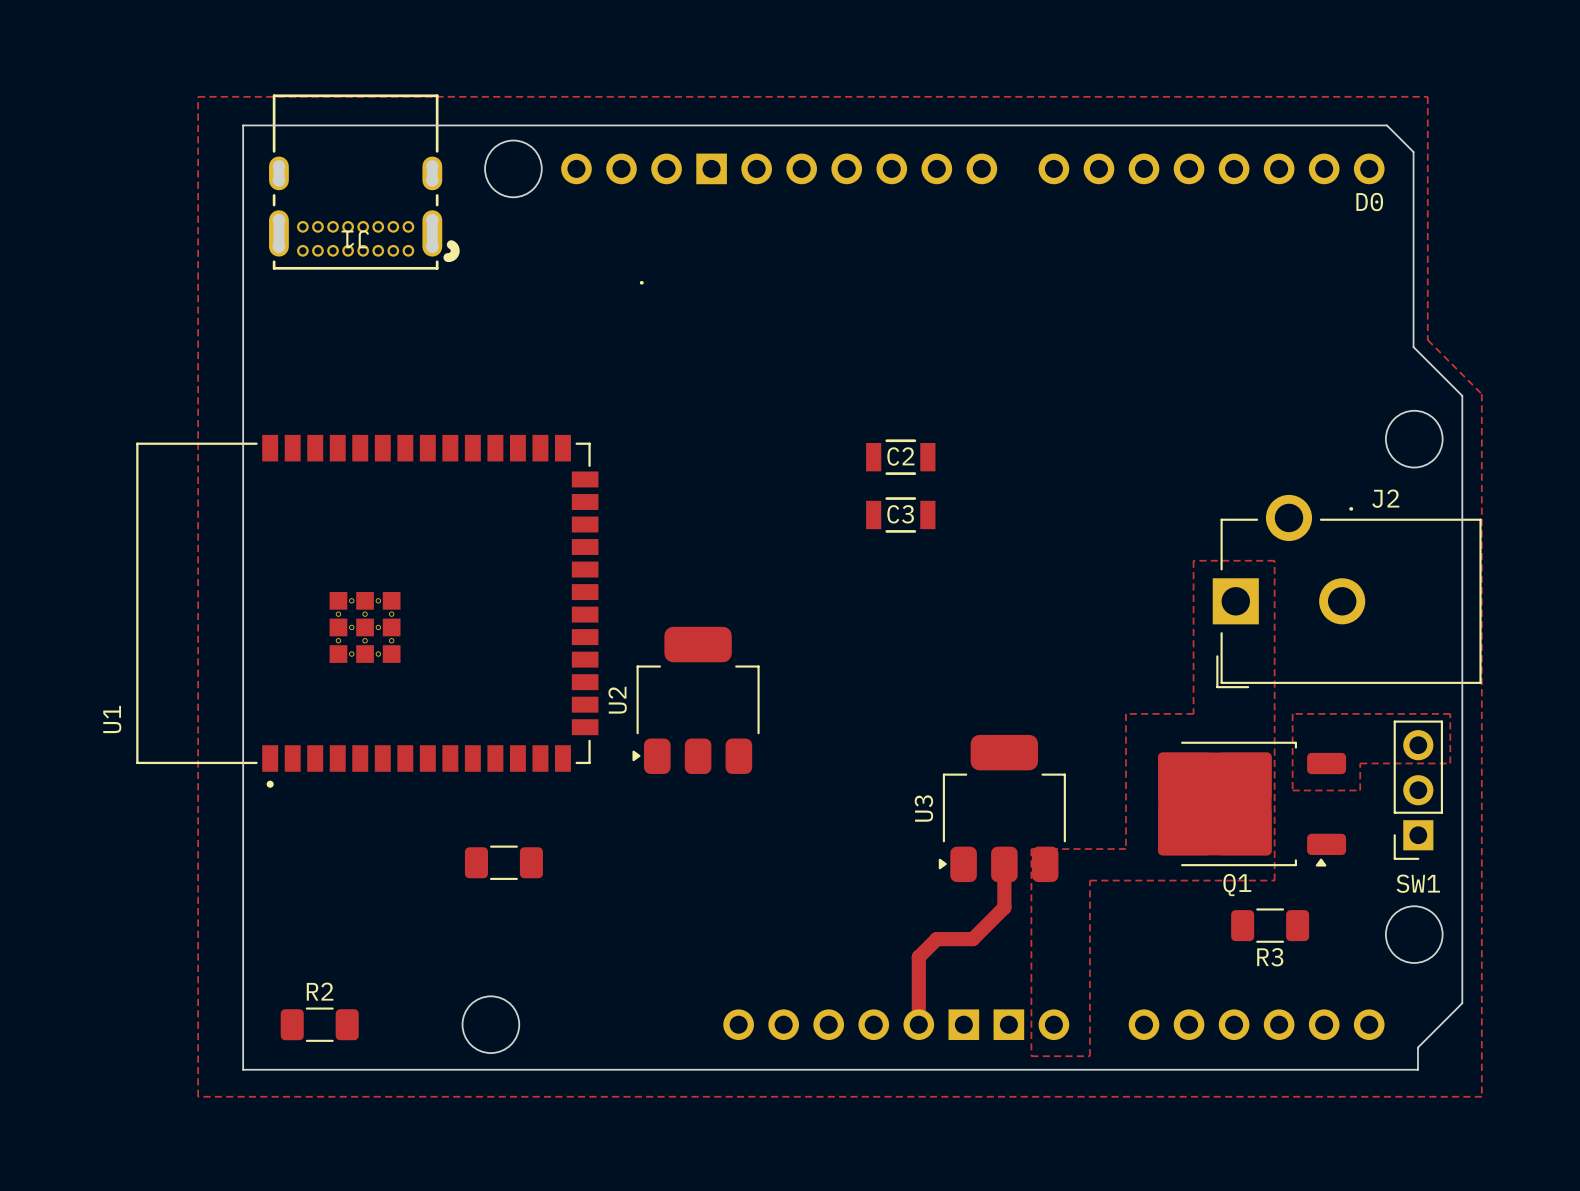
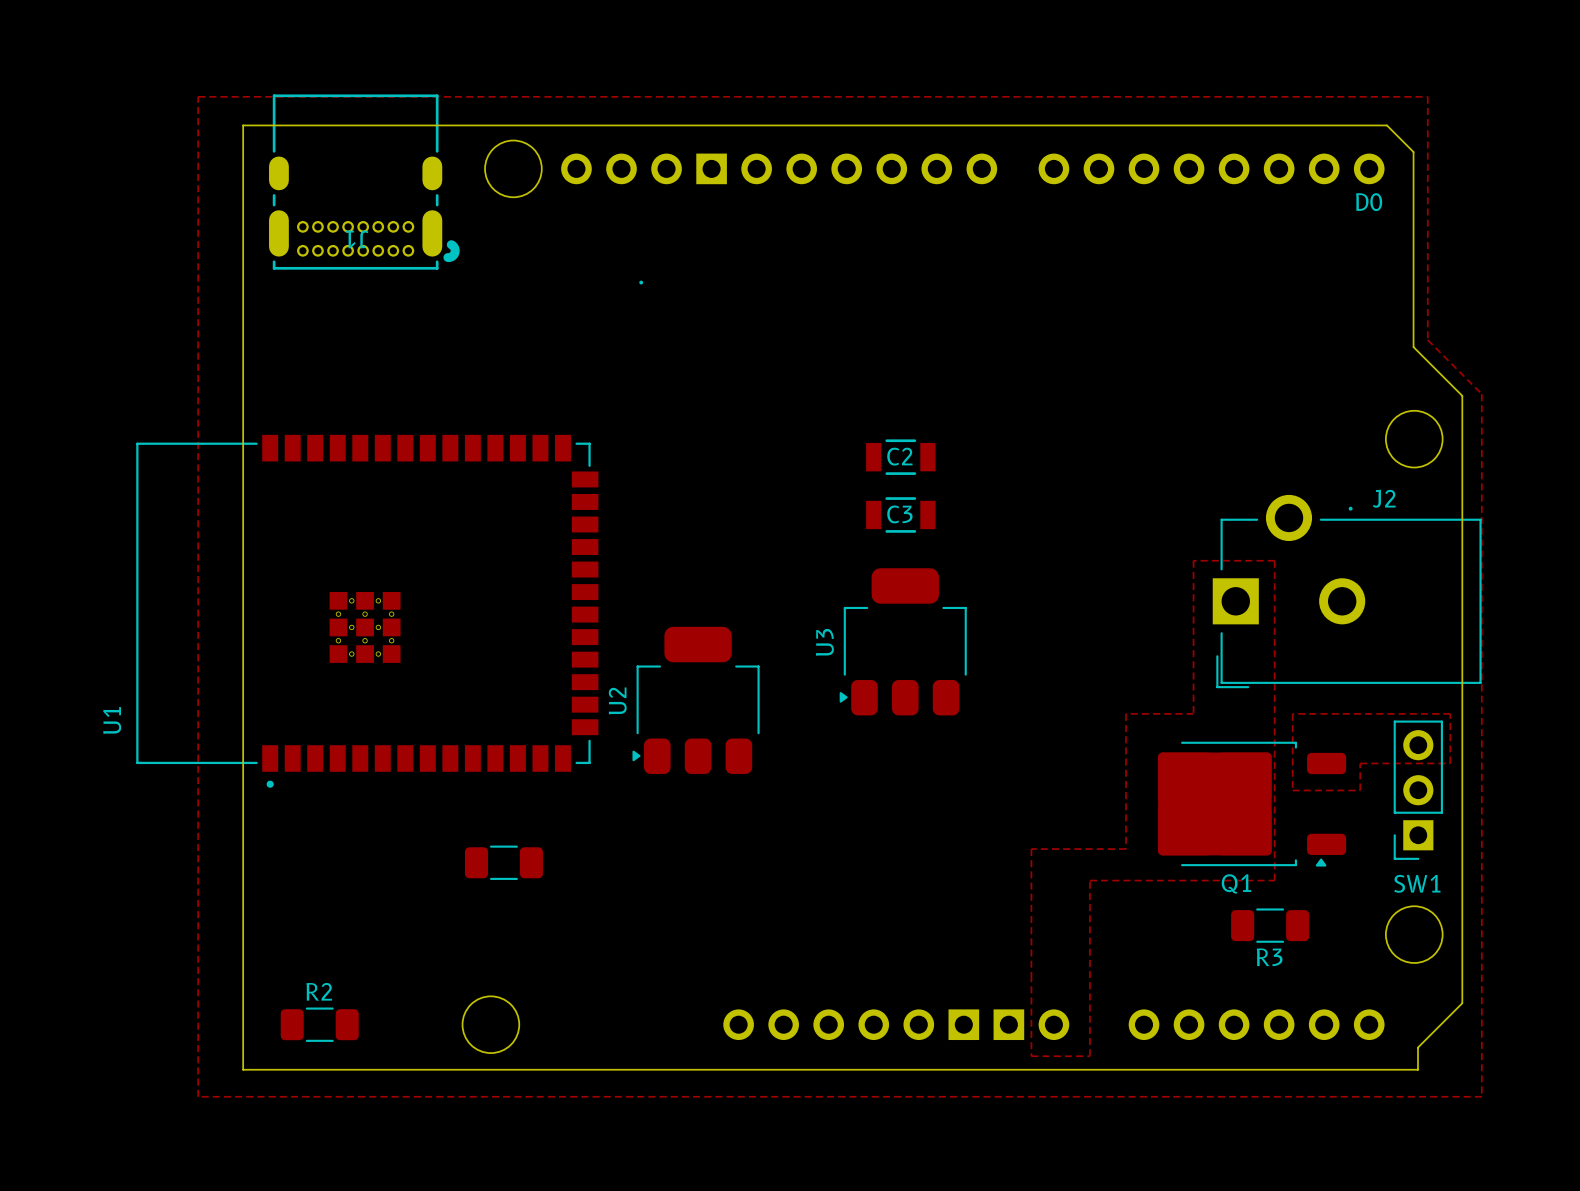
U3 position: (1002, 808) -> (903, 641)
track: (1004, 864) (1004, 907) (972, 939) (936, 939) (918, 957) (918, 1024) -> none

